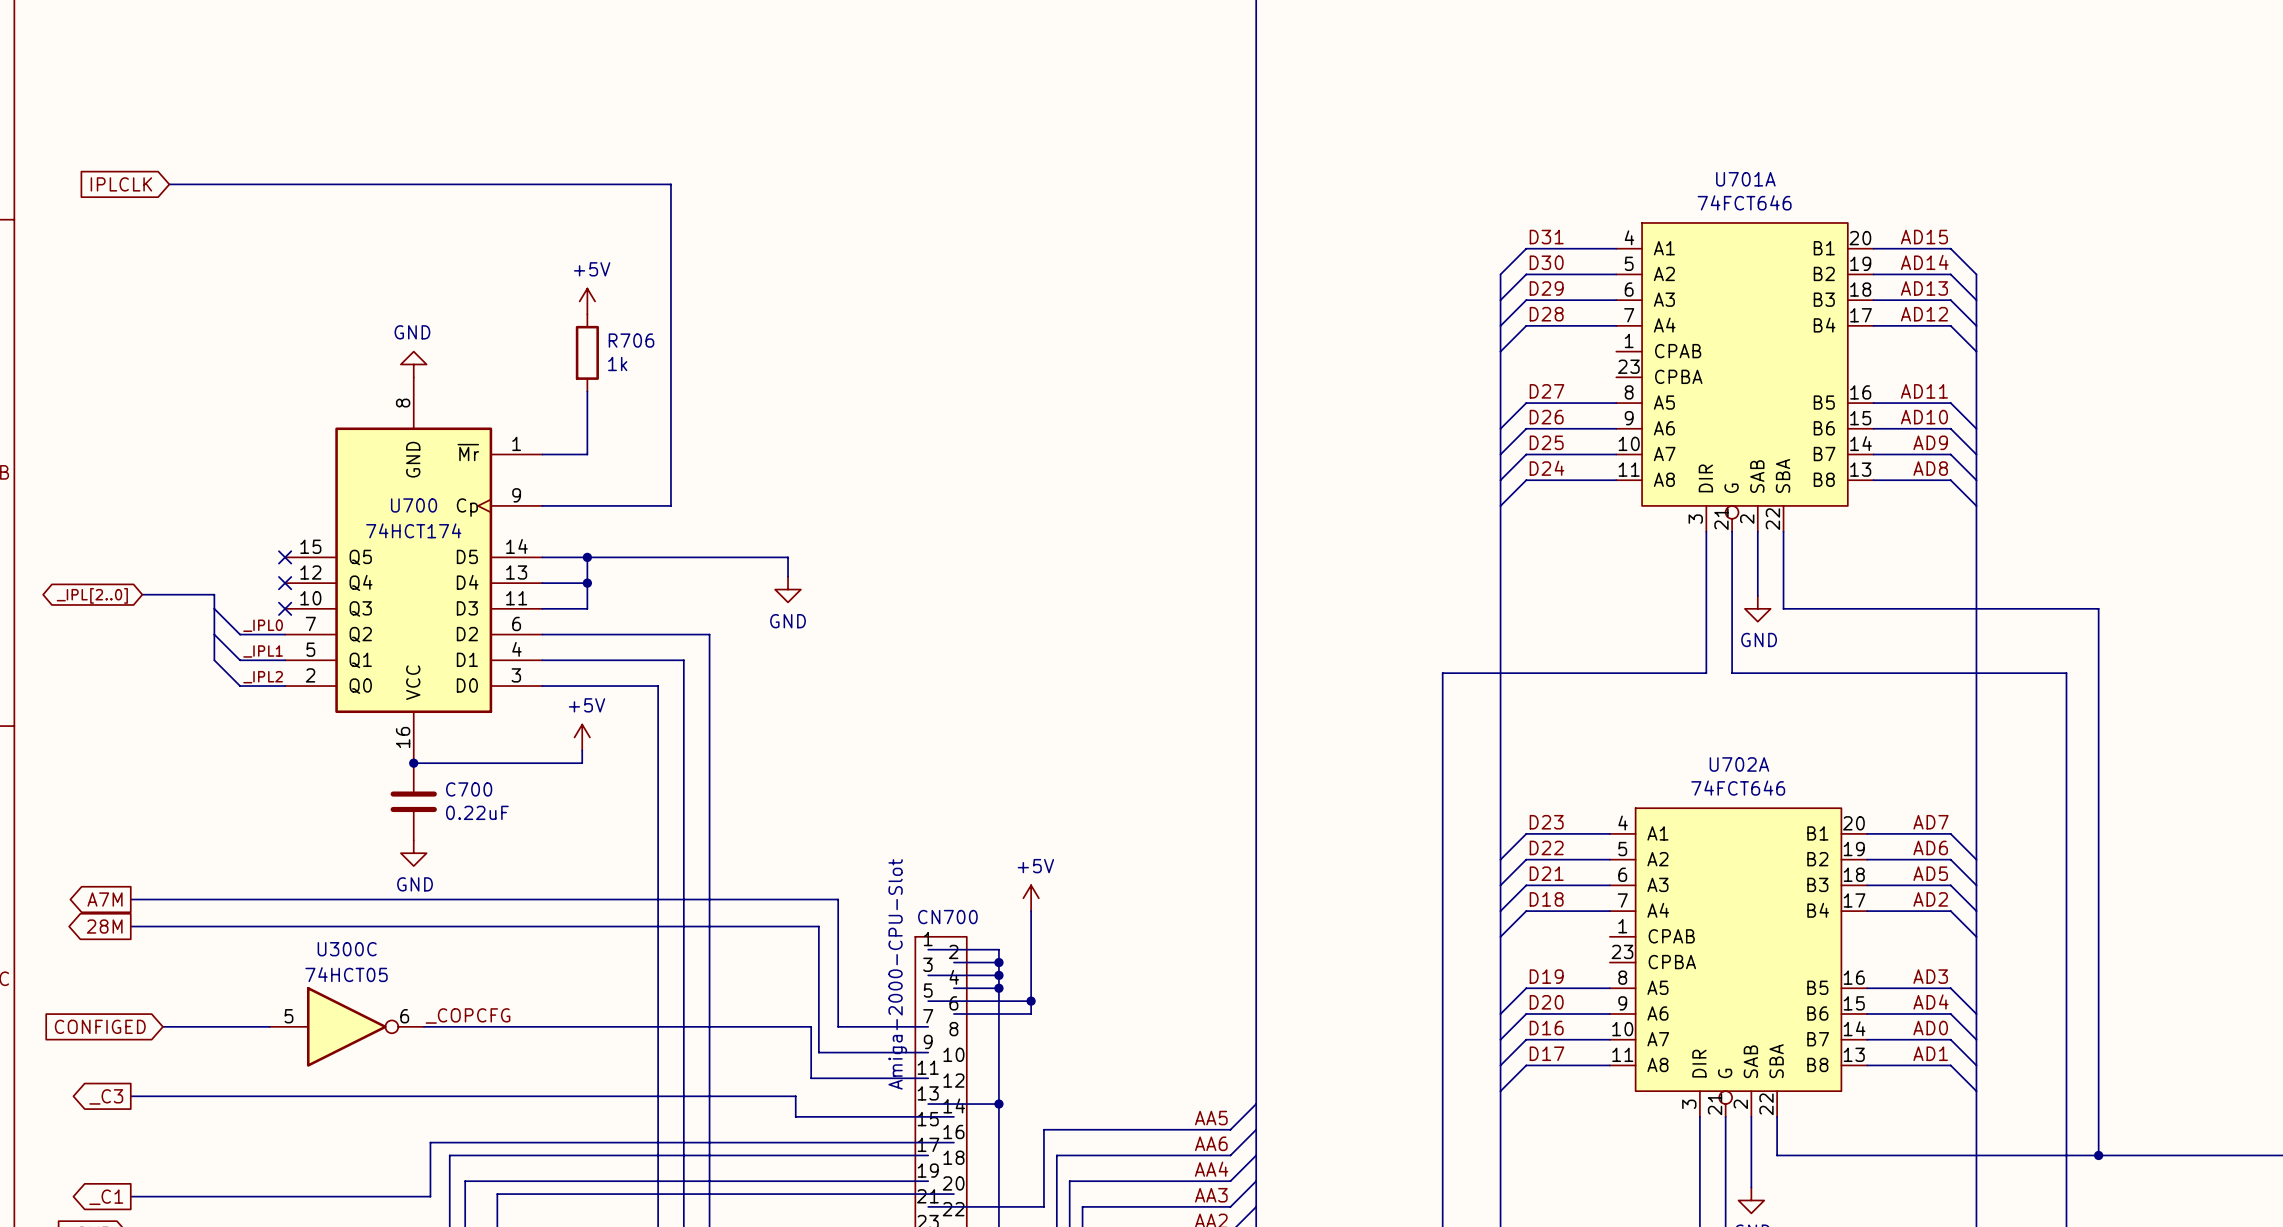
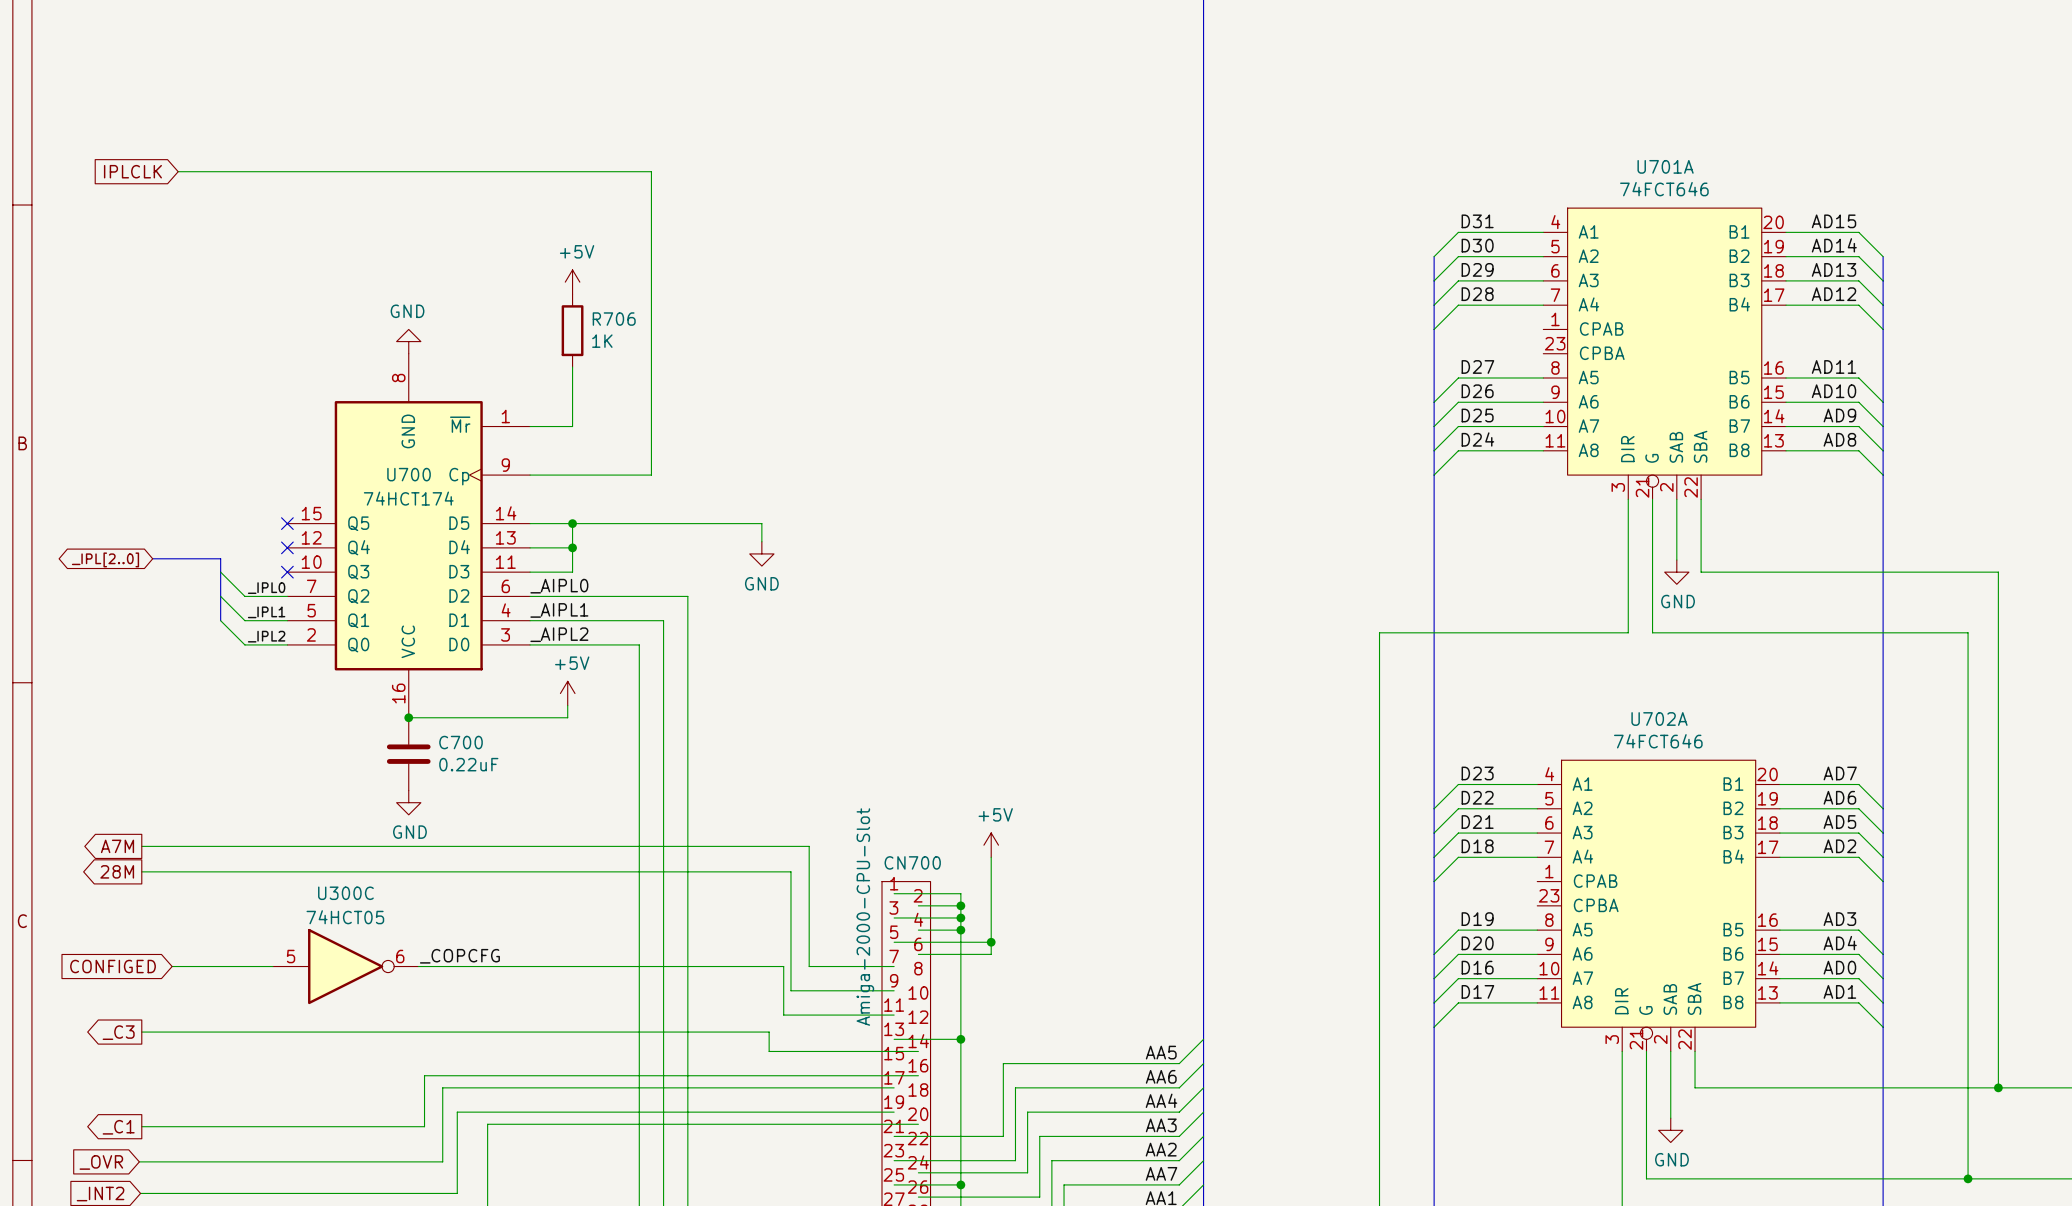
R706 value: 1k (617, 363) -> 1K (602, 341)
label: none -> _AIPL0 (559, 586)
label: none -> _AIPL1 (559, 610)
label: none -> _AIPL2 (559, 634)

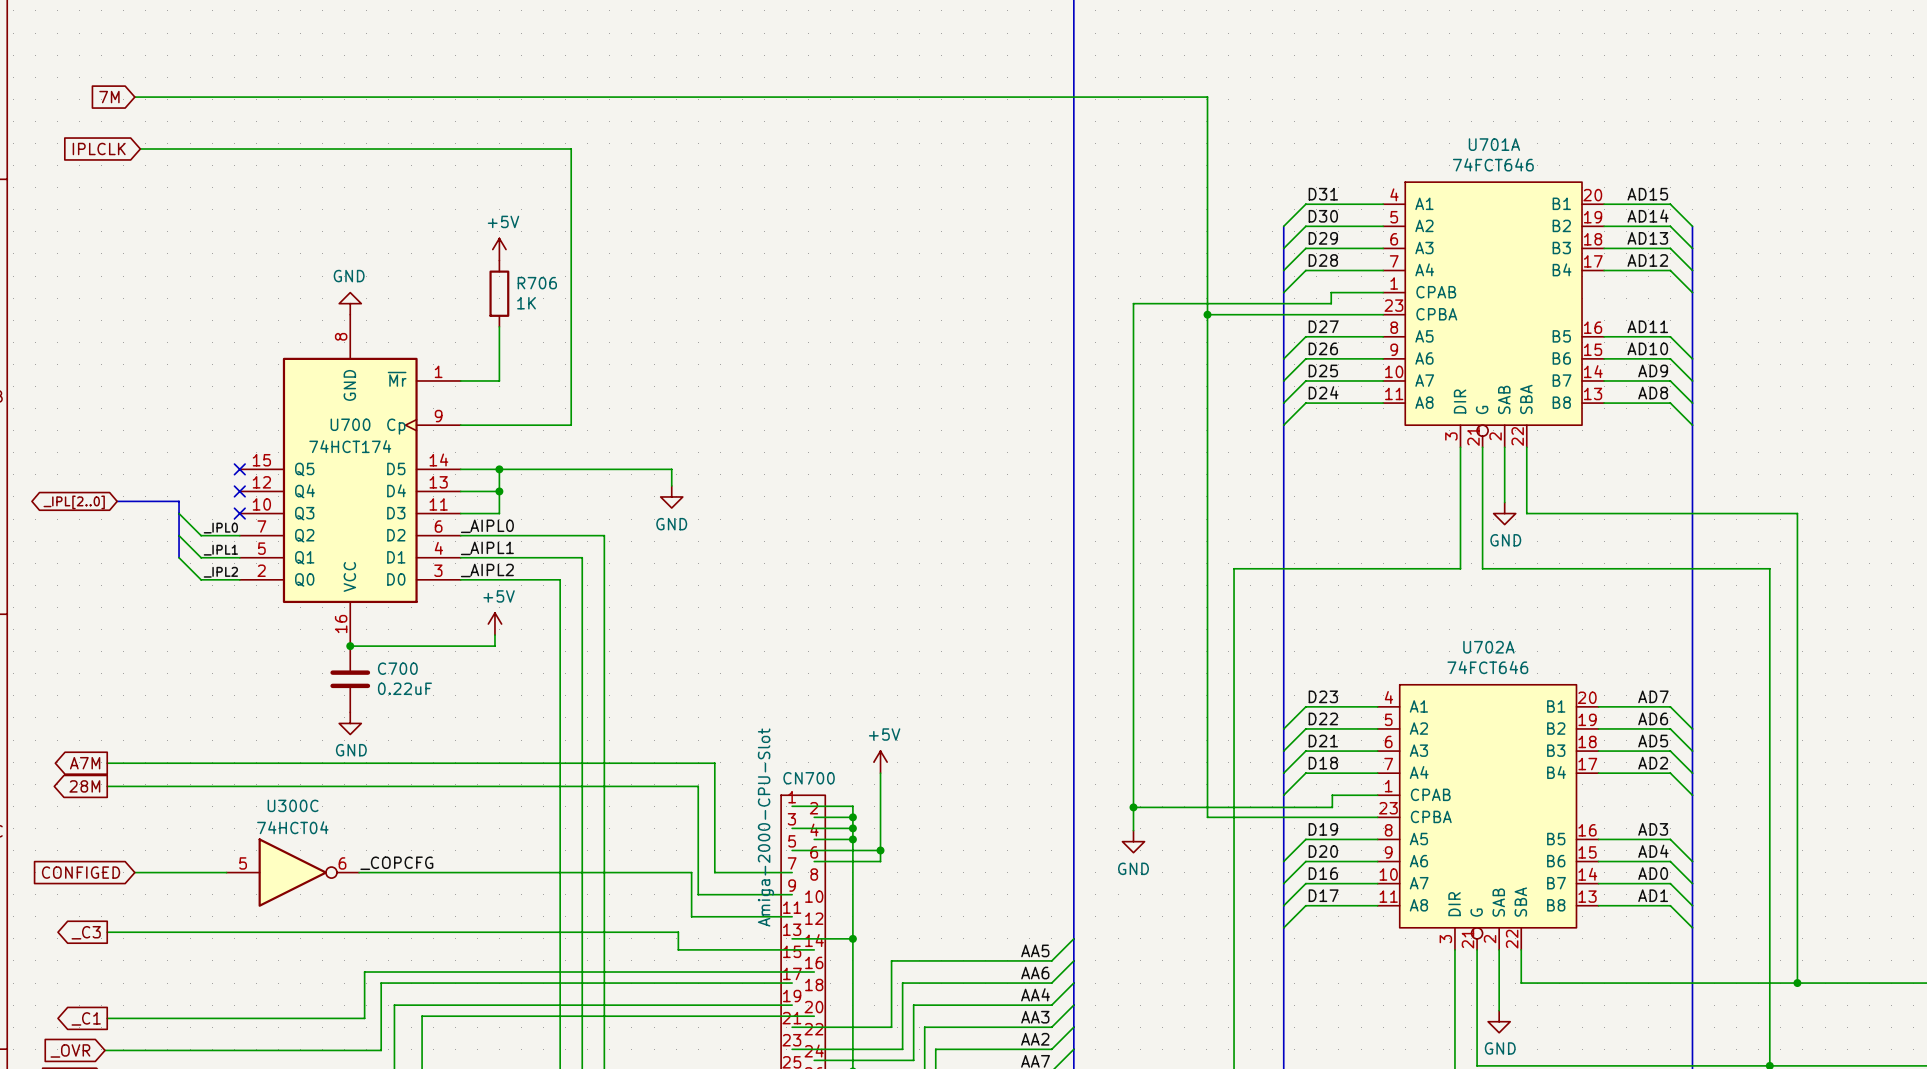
global label: none -> 7M (109, 97)
wire: none -> (134, 97) (1207, 97) (1207, 817) (1377, 817)
wire: none -> (1383, 292) (1331, 292) (1331, 303) (1133, 303) (1133, 830)
wire: none -> (1207, 314) (1383, 314)
junction: none -> (1207, 314)
wire: none -> (1377, 795) (1332, 795) (1332, 807) (1133, 807)
junction: none -> (1133, 807)
U300C value: 74HCT05 (345, 917) -> 74HCT04 (292, 827)
power symbol: none -> GND (1133, 841)

